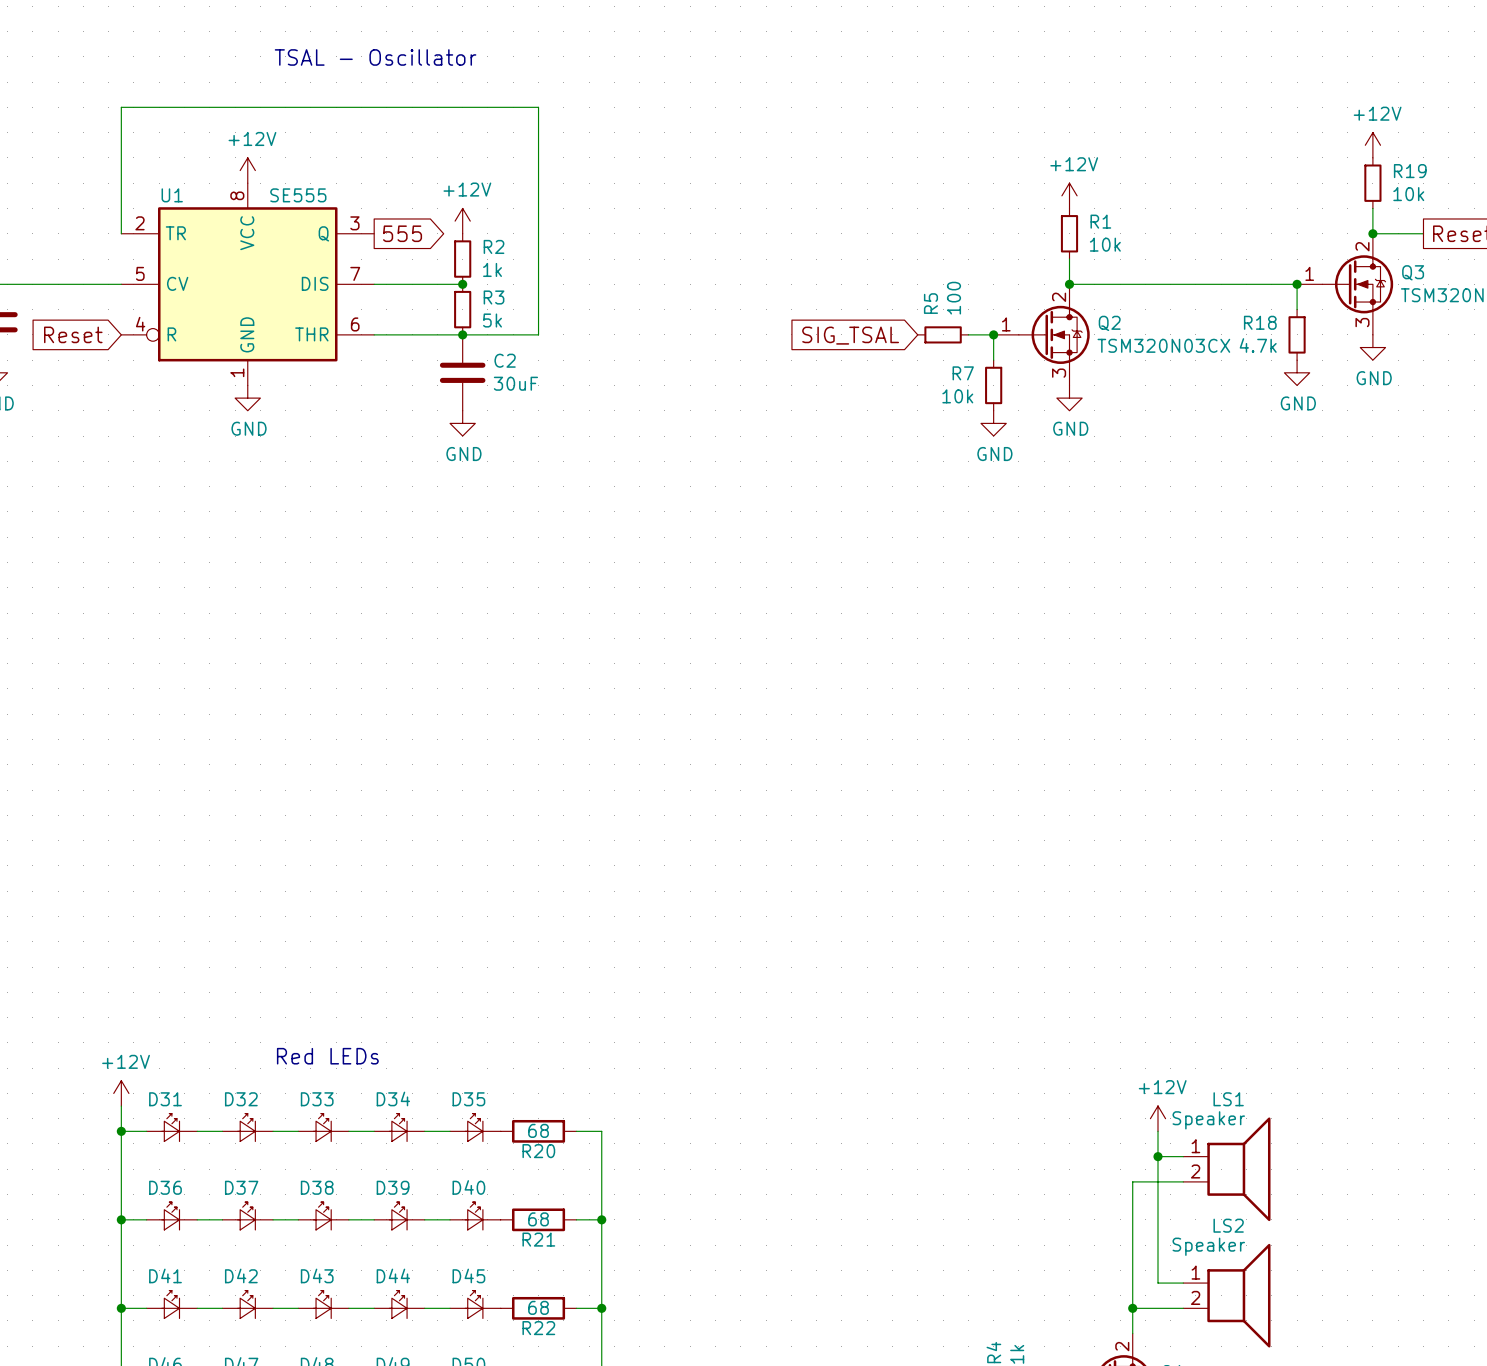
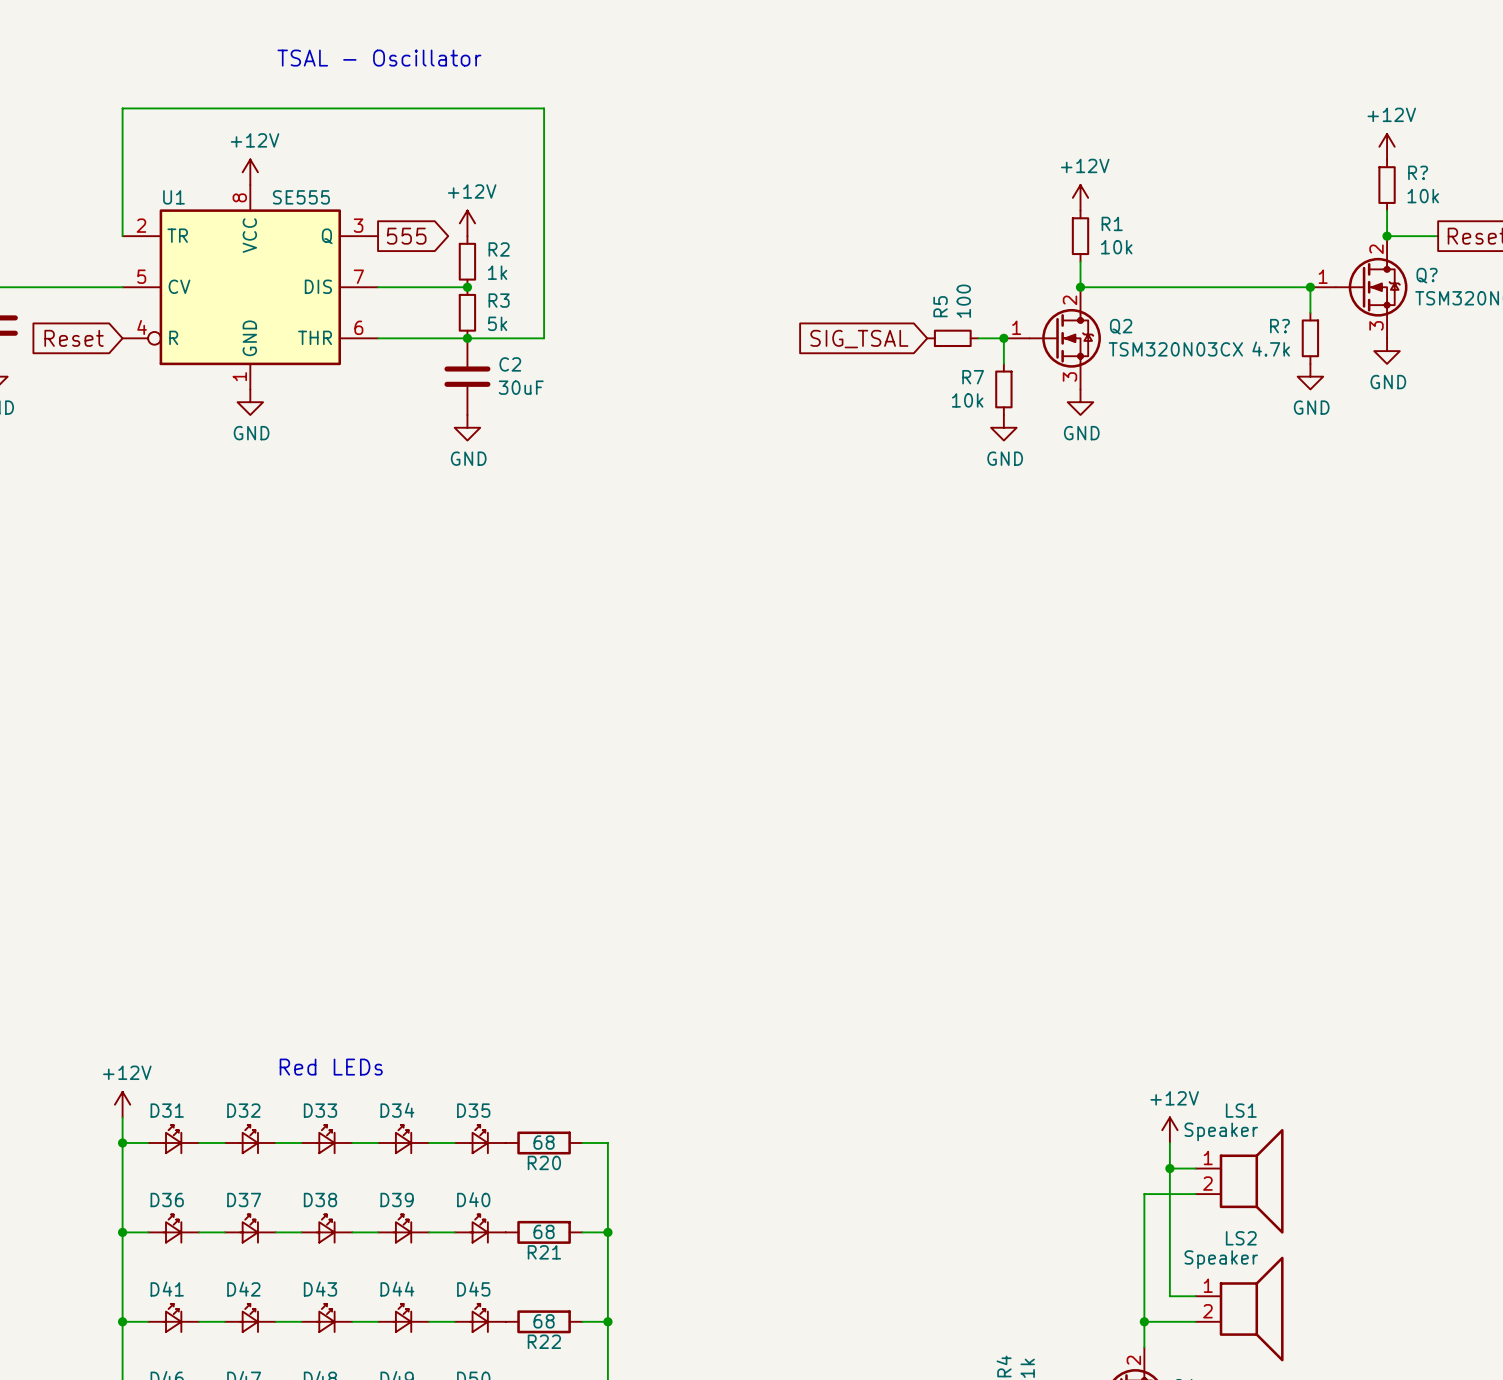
R19 name: R19 (1410, 171) -> R? (1418, 172)
Q3 name: Q3 (1413, 272) -> Q? (1427, 275)
R18 name: R18 (1260, 322) -> R? (1279, 326)

